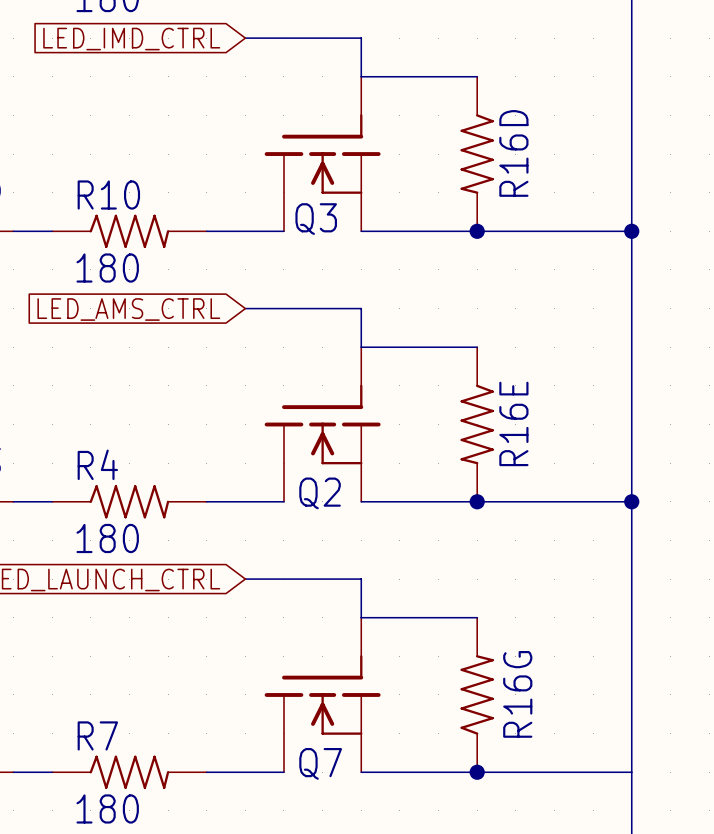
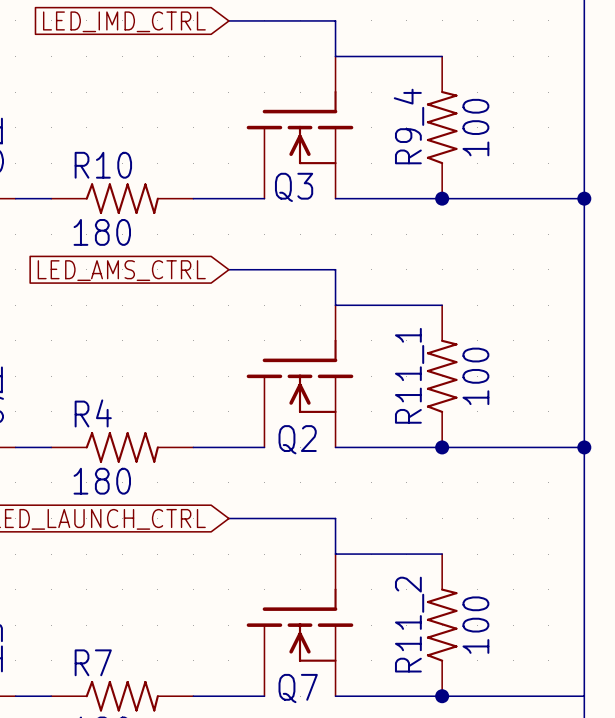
R16D: (477, 154) -> none
R9_4: none -> 100 (442, 127)
R16E: (477, 424) -> none
R11_1: none -> 100 (442, 376)
R16G value: none -> 100 (475, 625)
R16G name: R16G (517, 694) -> R11_2 (409, 624)

